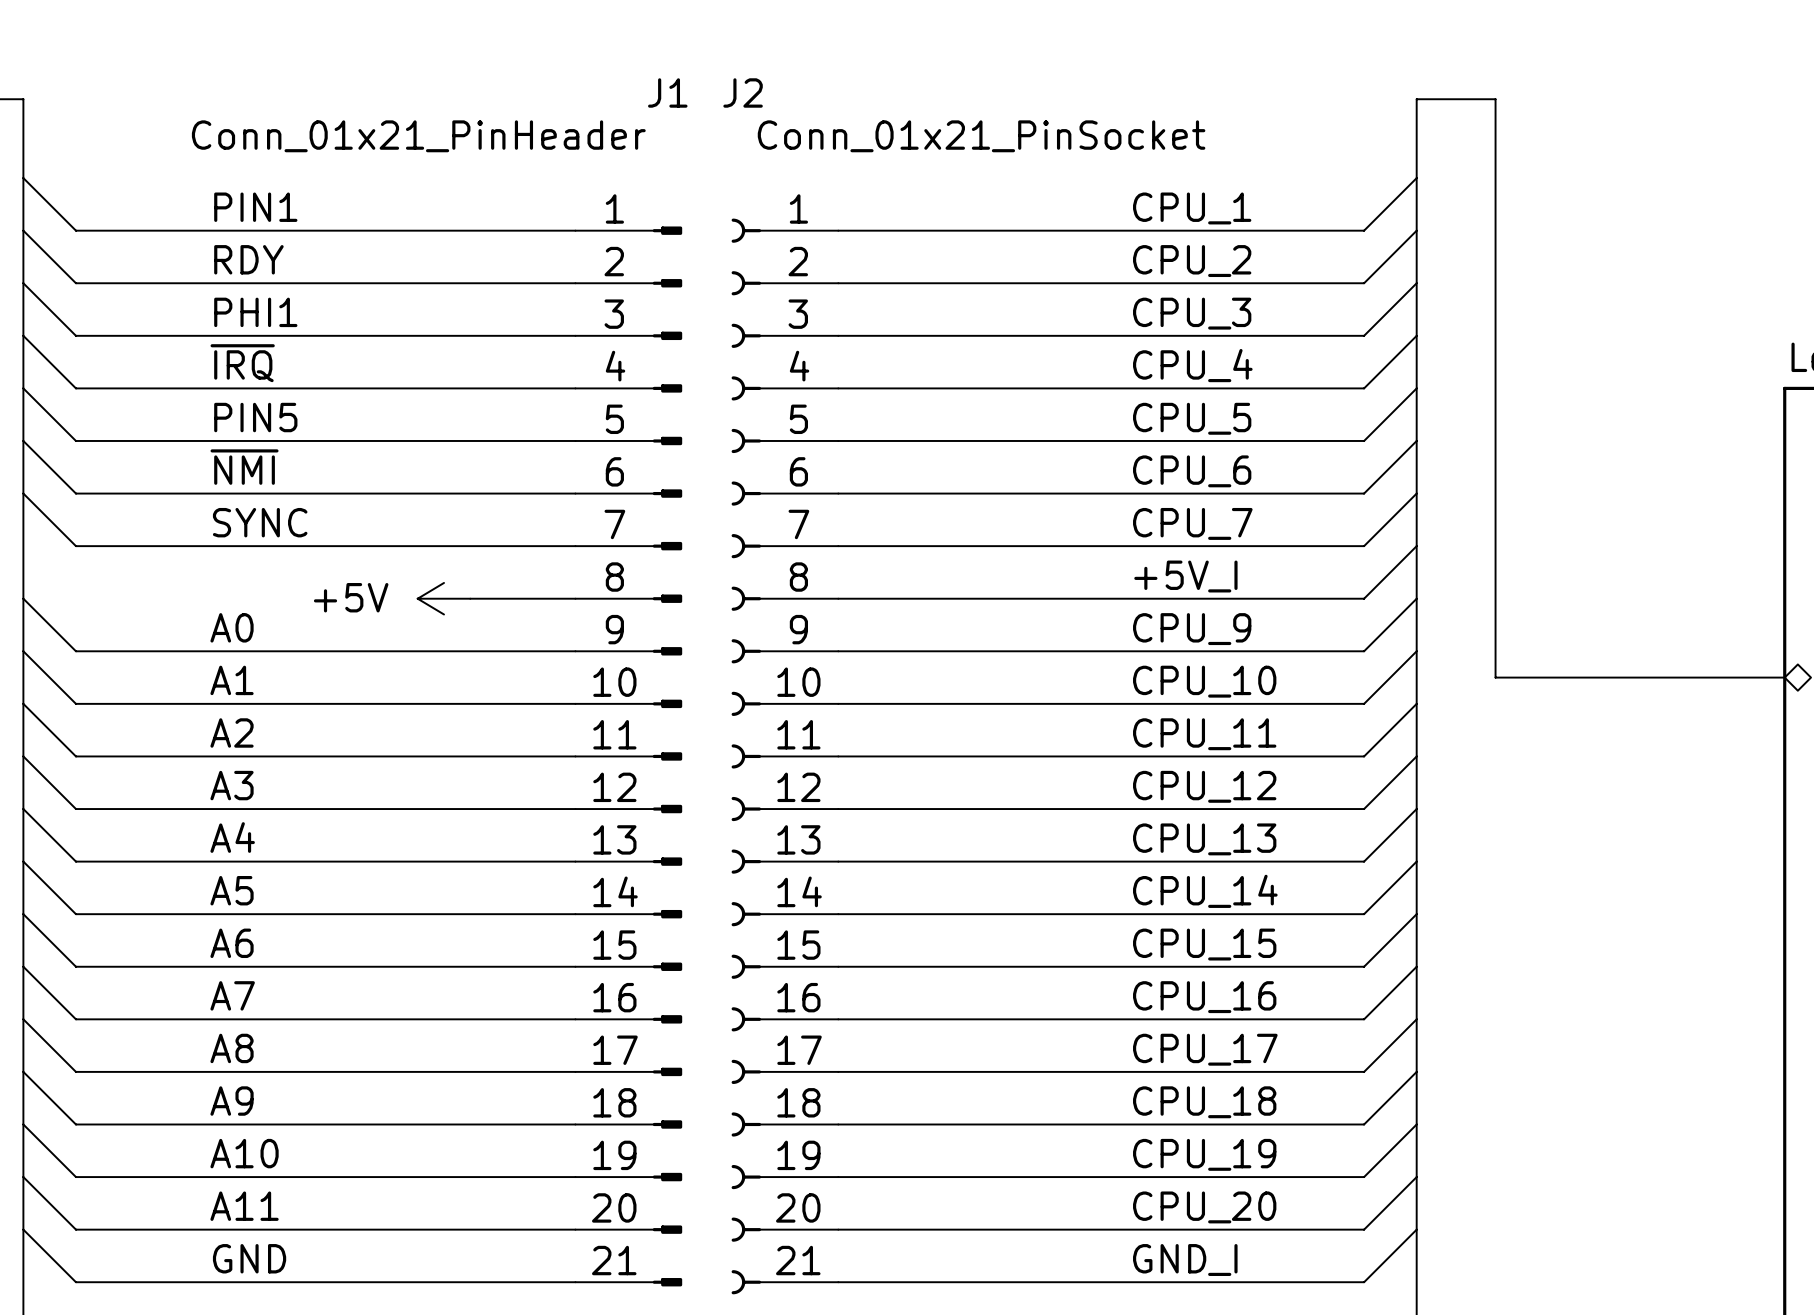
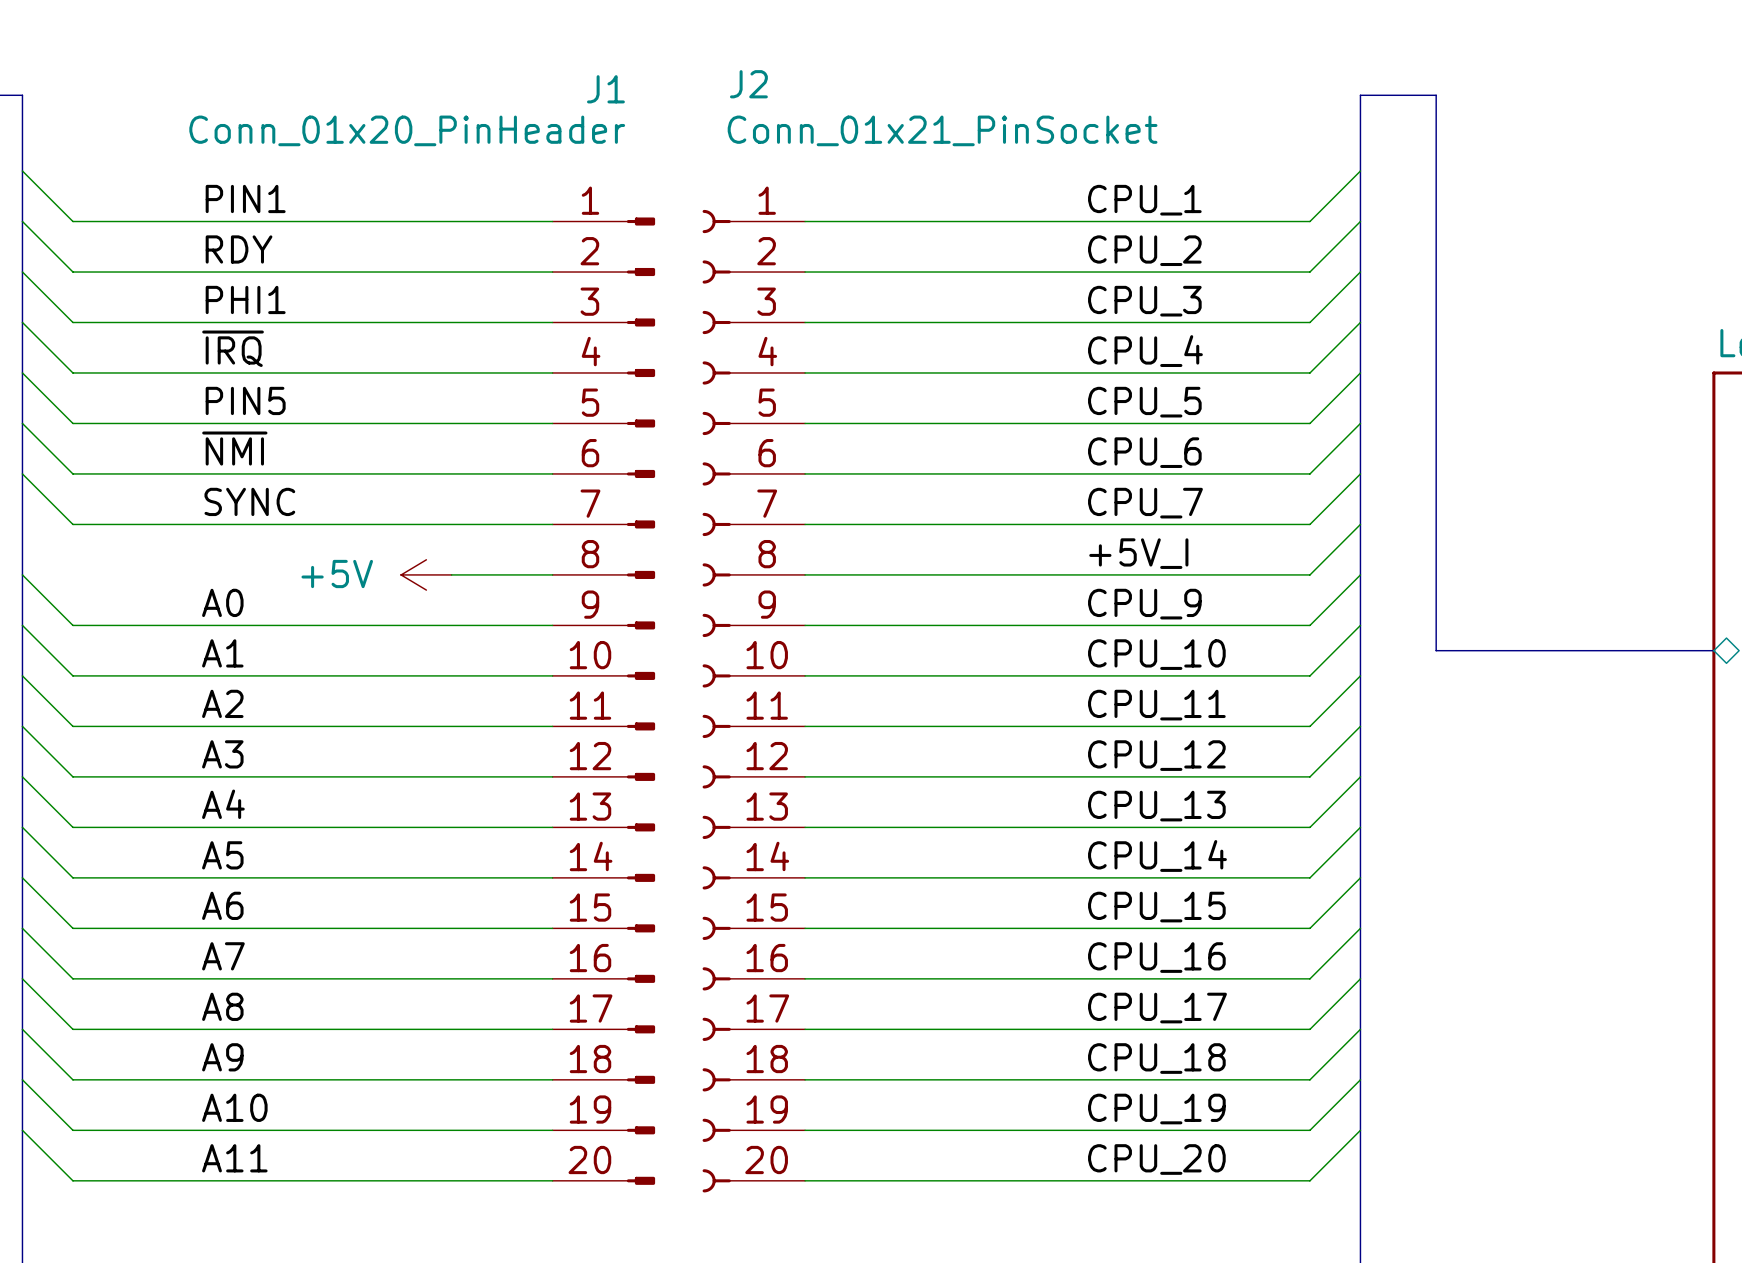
J1 name position: J1 (667, 92) -> J1 (605, 89)
J2 name position: J2 (743, 92) -> J2 (748, 84)
J1 value: Conn_01x21_PinHeader (418, 136) -> Conn_01x20_PinHeader (407, 130)
J2 symbol: [731, 218, 839, 1295] -> [702, 209, 806, 1193]
J1 symbol: [575, 226, 683, 1287] -> [552, 217, 656, 1185]
wire: (23, 1229) (75, 1282) (575, 1282) -> none
wire: (1416, 1229) (1364, 1282) (838, 1282) -> none
label: GND (249, 1258) -> none
label: GND_I (1185, 1260) -> none

